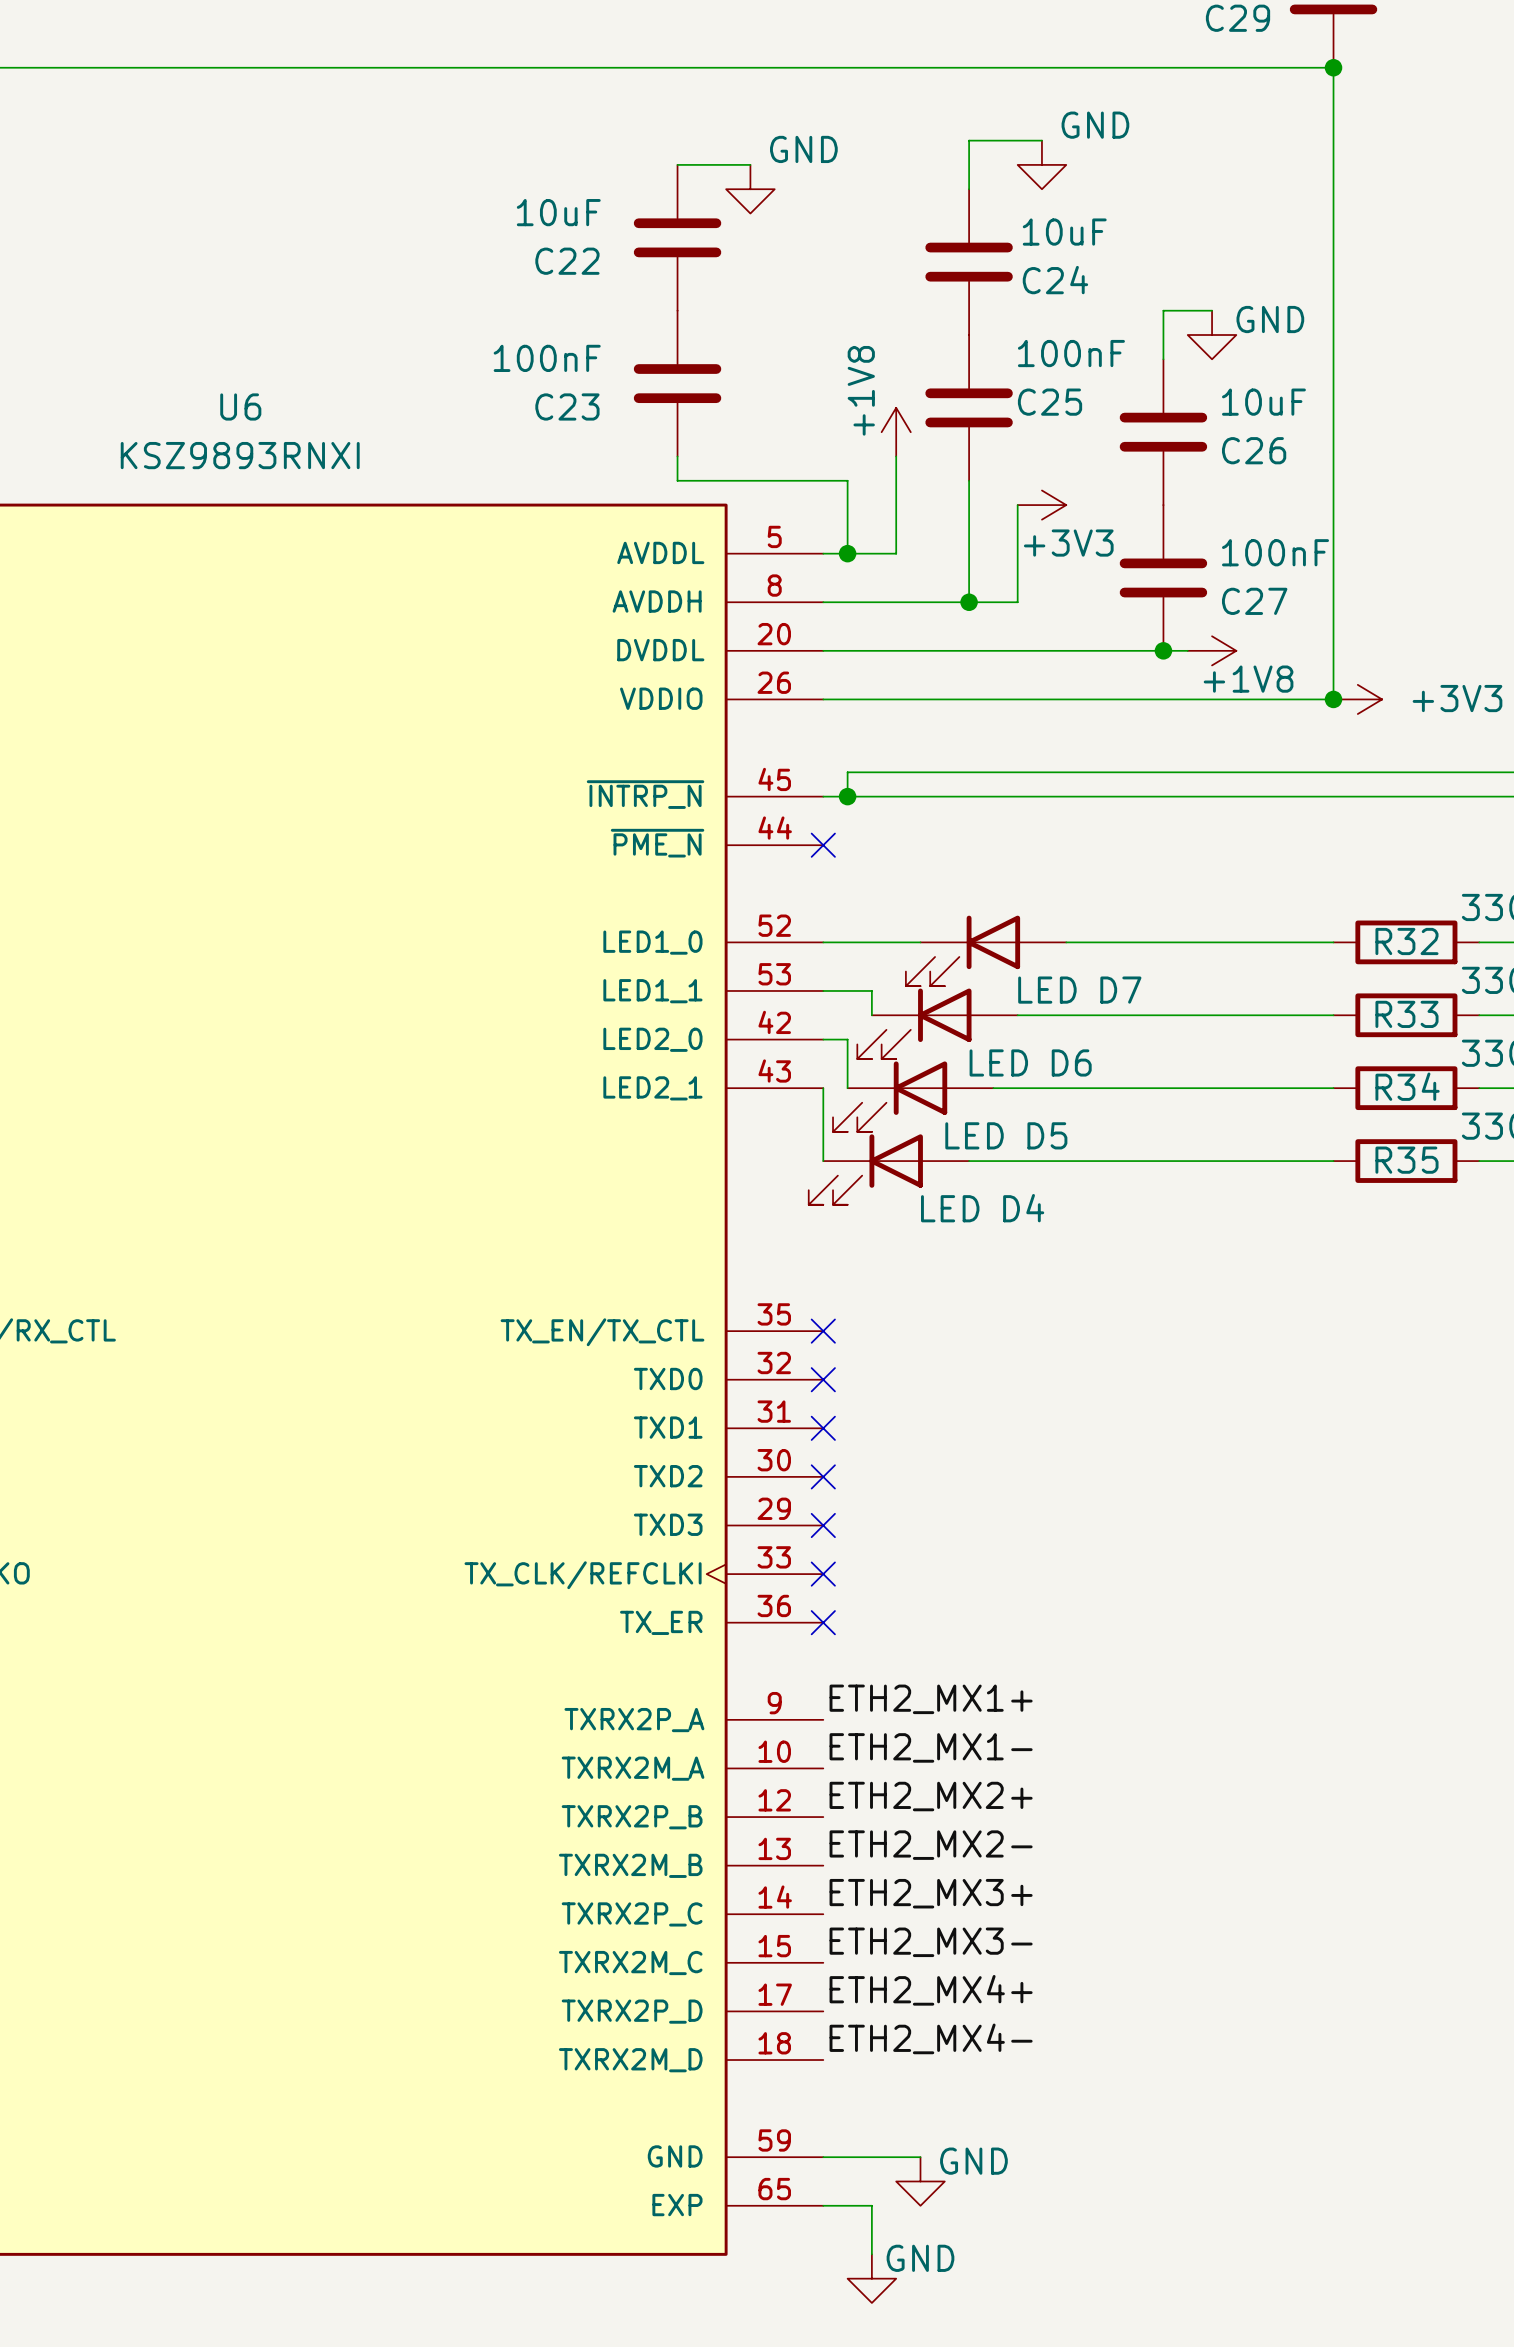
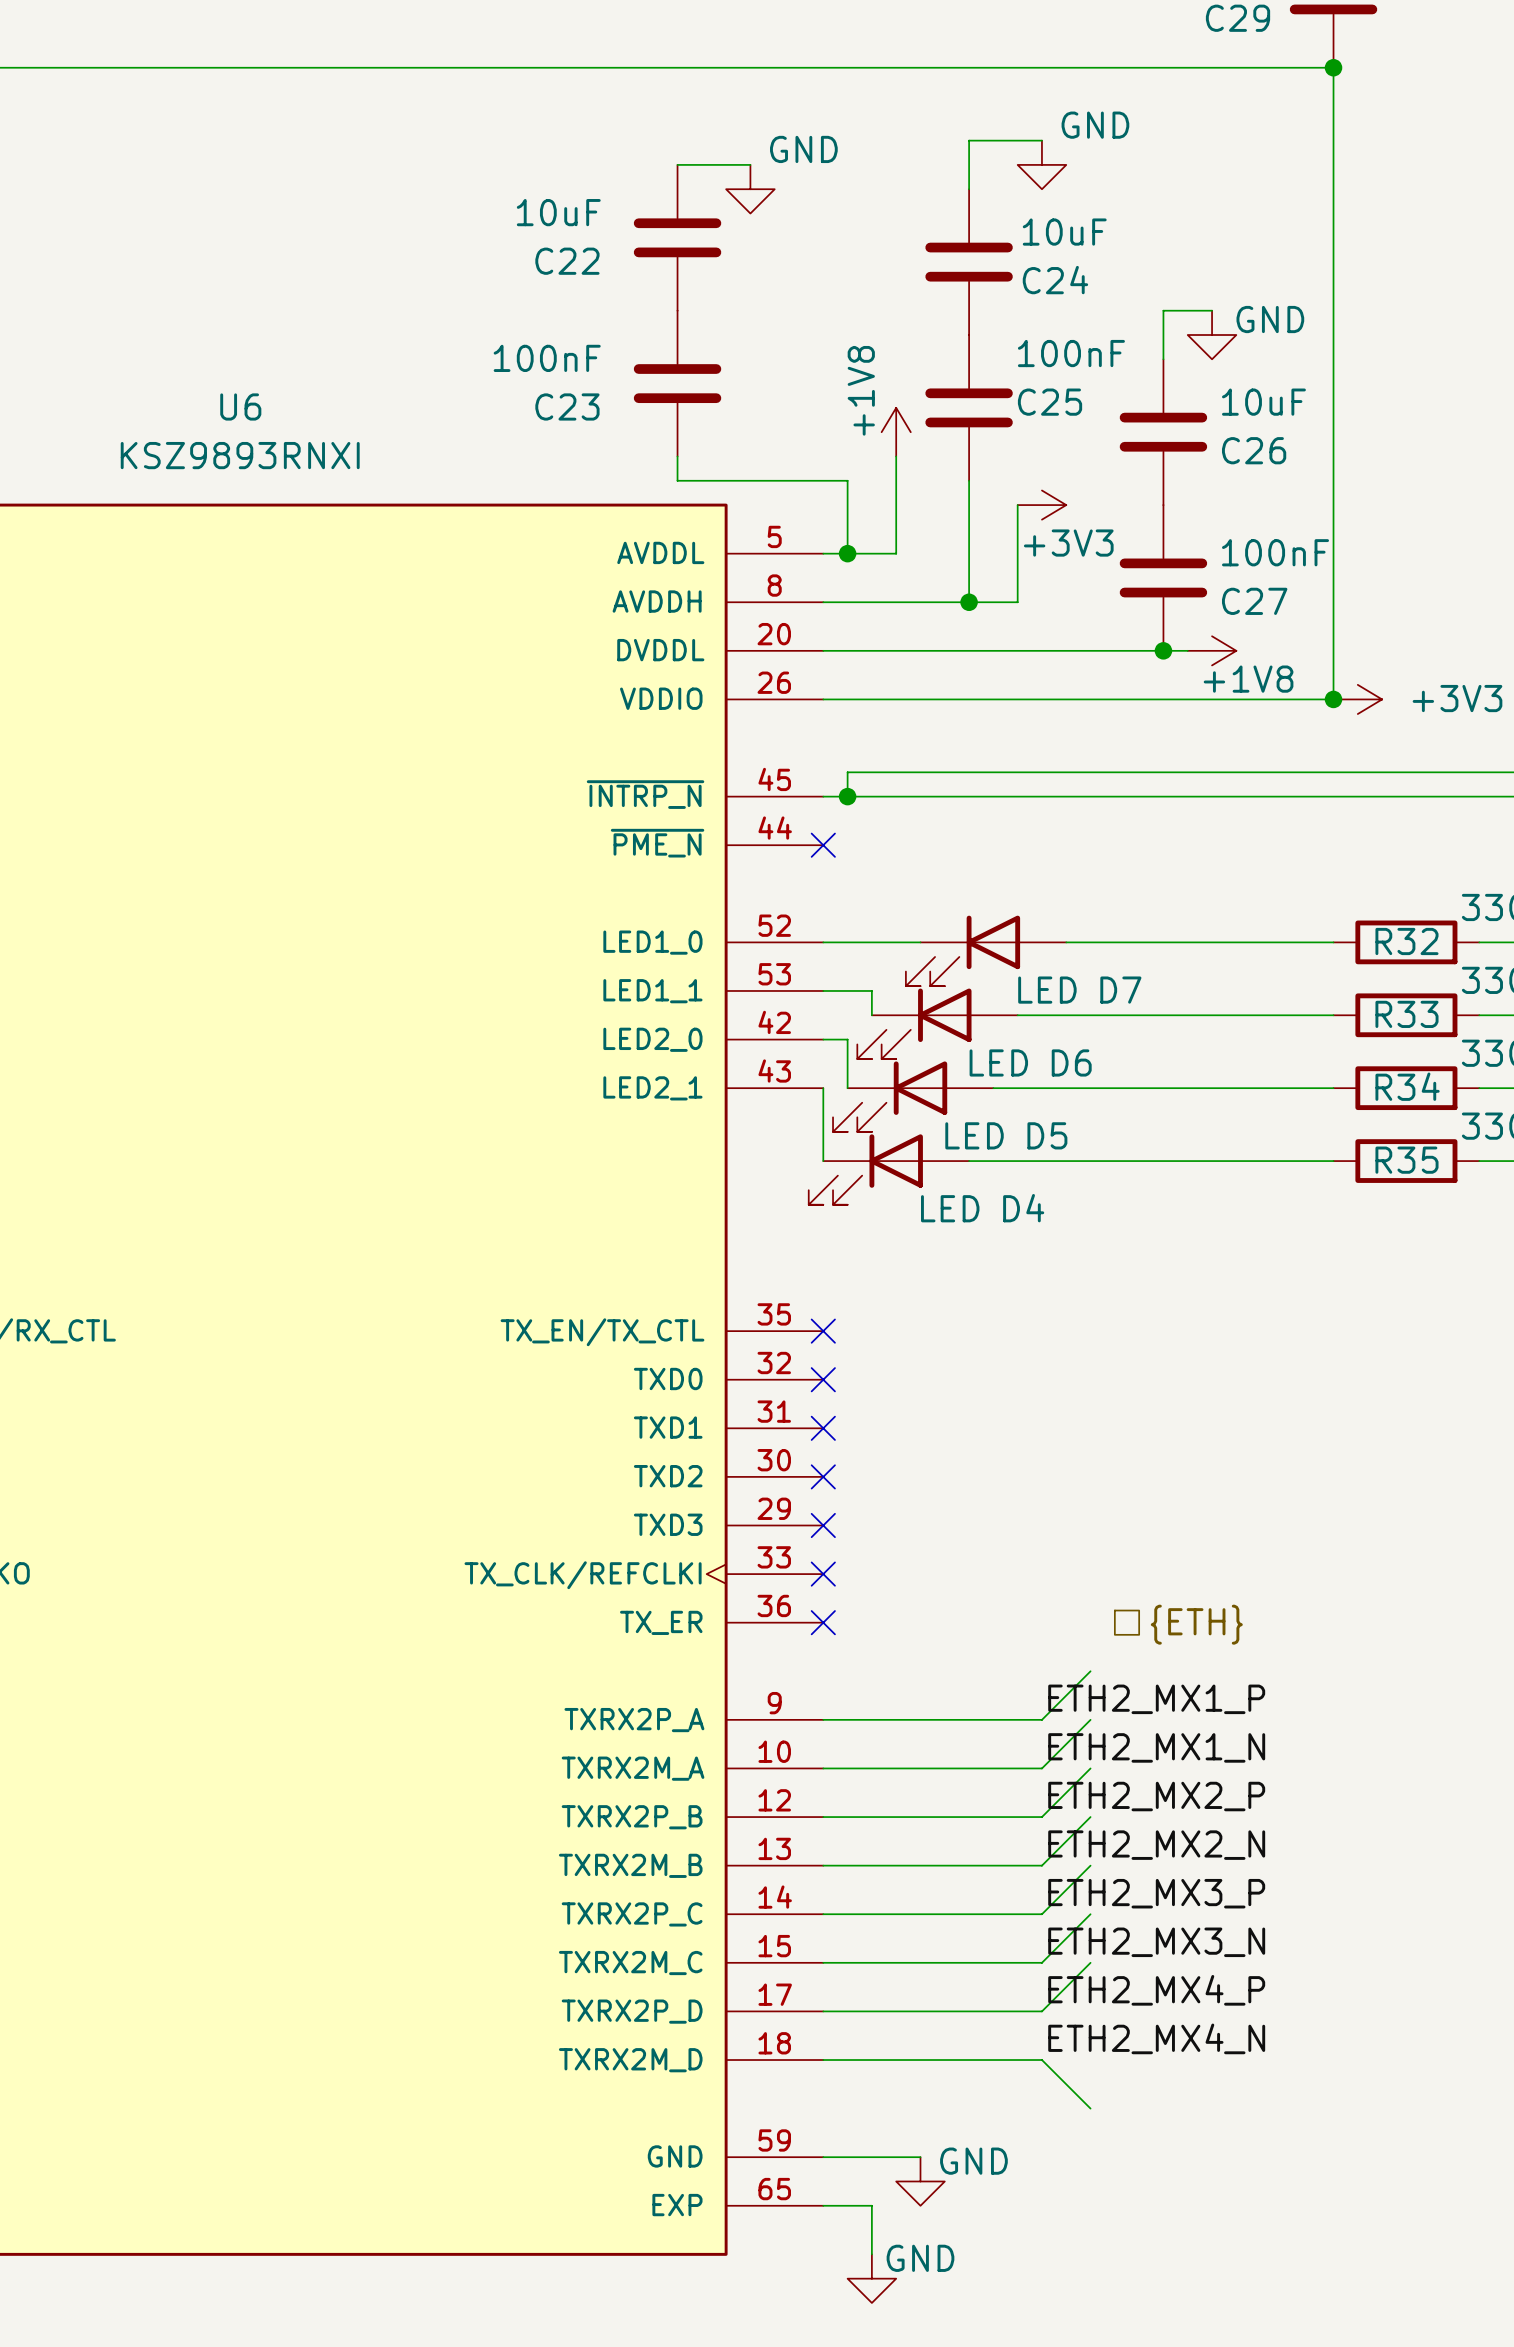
hierarchical label: none -> {ETH} (1196, 1624)
wire: none -> (1090, 1671) (1041, 1719) (823, 1719)
label: ETH2_MX1+ (931, 1699) -> none
label: none -> ETH2_MX1_P (1156, 1699)
wire: none -> (1090, 1719) (1041, 1768) (823, 1768)
label: ETH2_MX1- (931, 1747) -> none
label: none -> ETH2_MX1_N (1156, 1747)
wire: none -> (1090, 1768) (1041, 1817) (823, 1817)
label: ETH2_MX2+ (931, 1796) -> none
label: none -> ETH2_MX2_P (1156, 1796)
wire: none -> (1090, 1817) (1041, 1865) (823, 1865)
label: ETH2_MX2- (931, 1845) -> none
label: none -> ETH2_MX2_N (1156, 1845)
wire: none -> (1090, 1865) (1041, 1914) (823, 1914)
label: ETH2_MX3+ (931, 1893) -> none
label: none -> ETH2_MX3_P (1156, 1893)
wire: none -> (1090, 1914) (1041, 1962) (823, 1962)
label: ETH2_MX3- (931, 1942) -> none
label: none -> ETH2_MX3_N (1156, 1942)
wire: none -> (1090, 1962) (1041, 2011) (823, 2011)
label: ETH2_MX4+ (931, 1990) -> none
label: none -> ETH2_MX4_P (1156, 1990)
label: ETH2_MX4- (931, 2038) -> none
label: none -> ETH2_MX4_N (1156, 2038)
wire: none -> (823, 2060) (1041, 2060) (1090, 2108)

